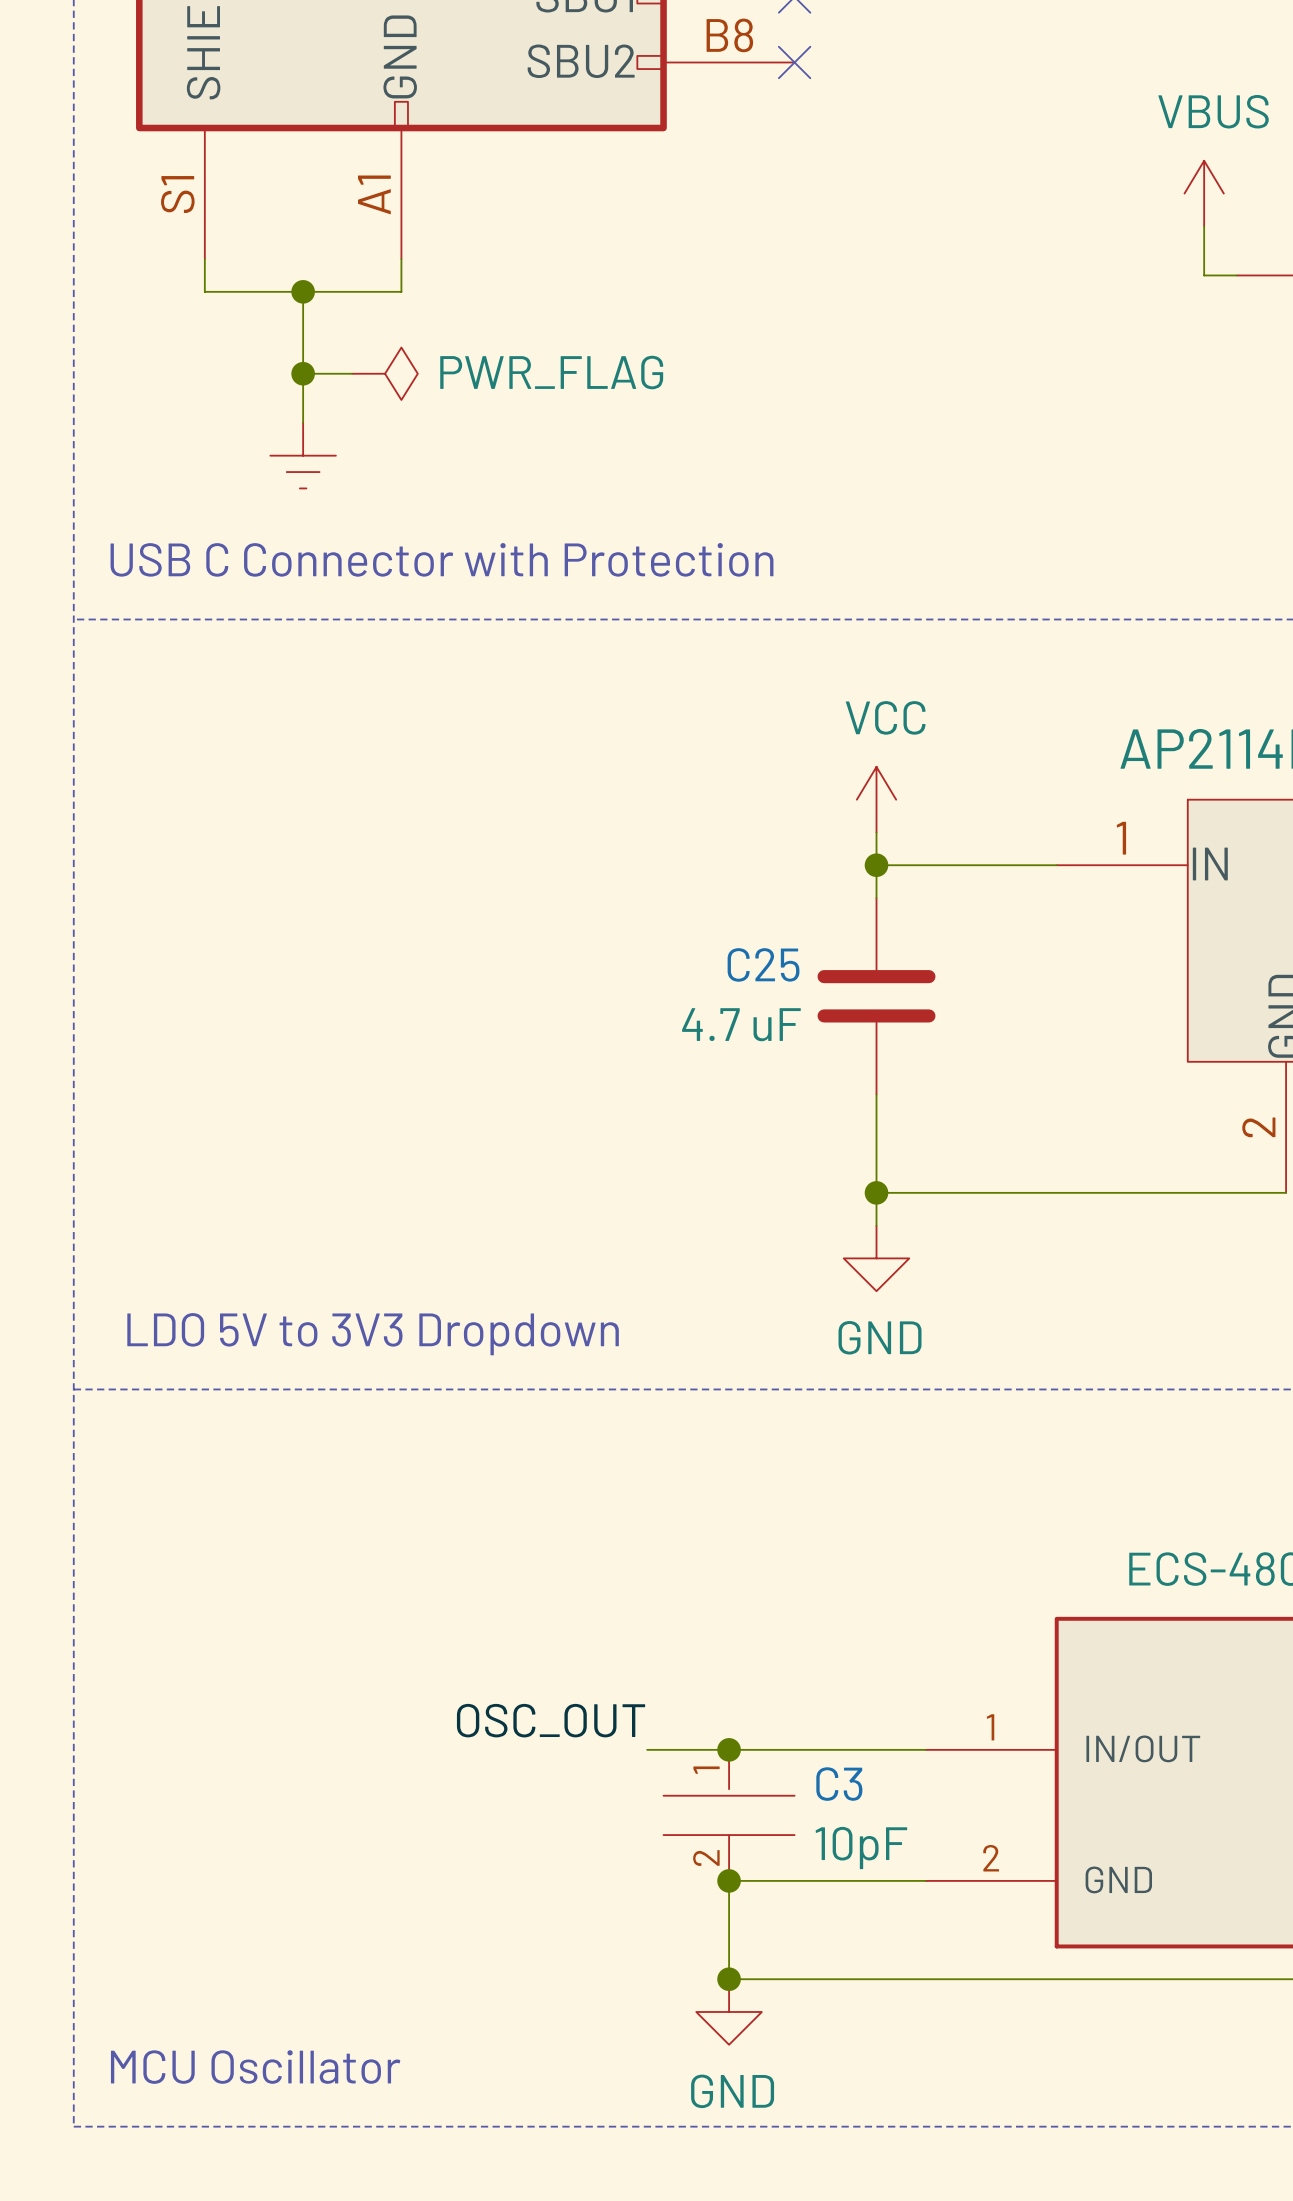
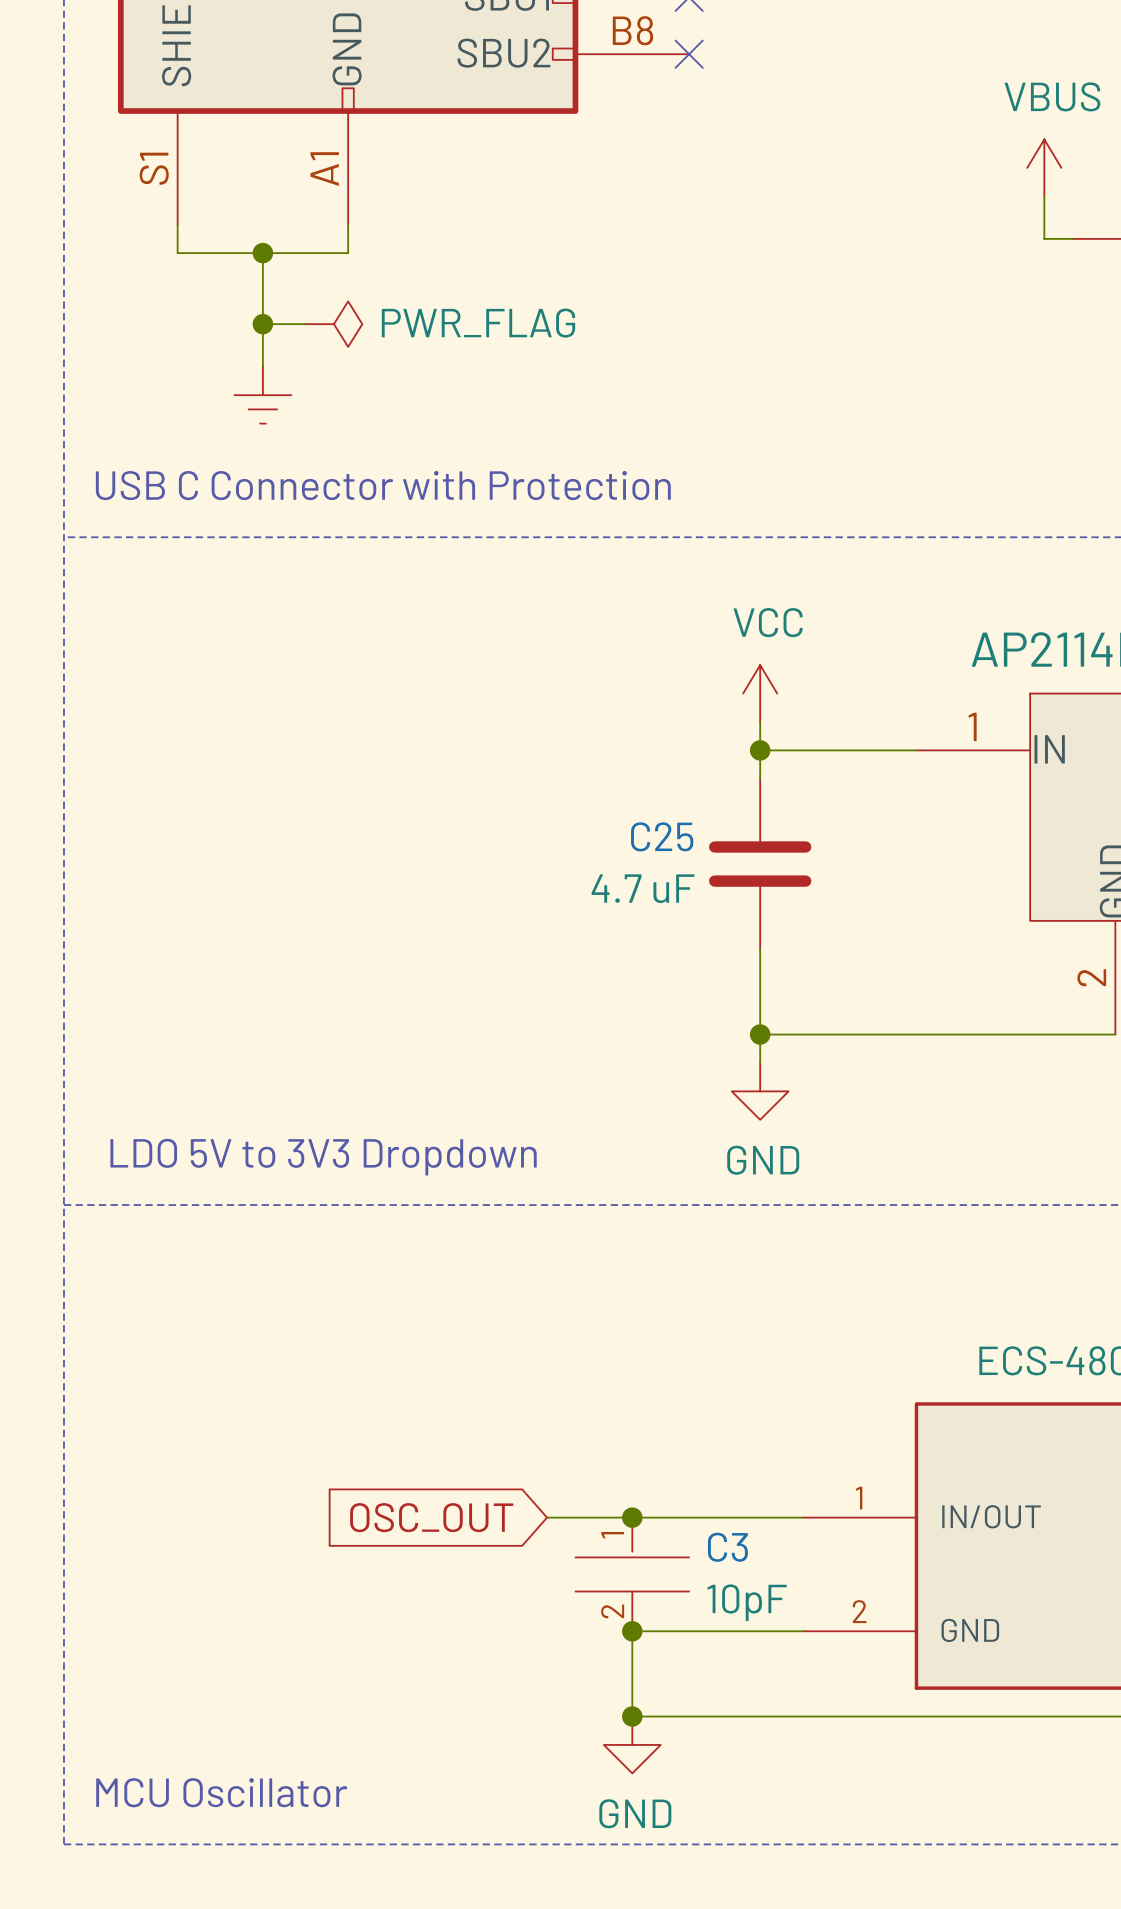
label: OSC_OUT (551, 1720) -> none
global label: none -> OSC_OUT (431, 1517)
wire: none -> (547, 1517) (561, 1517)

